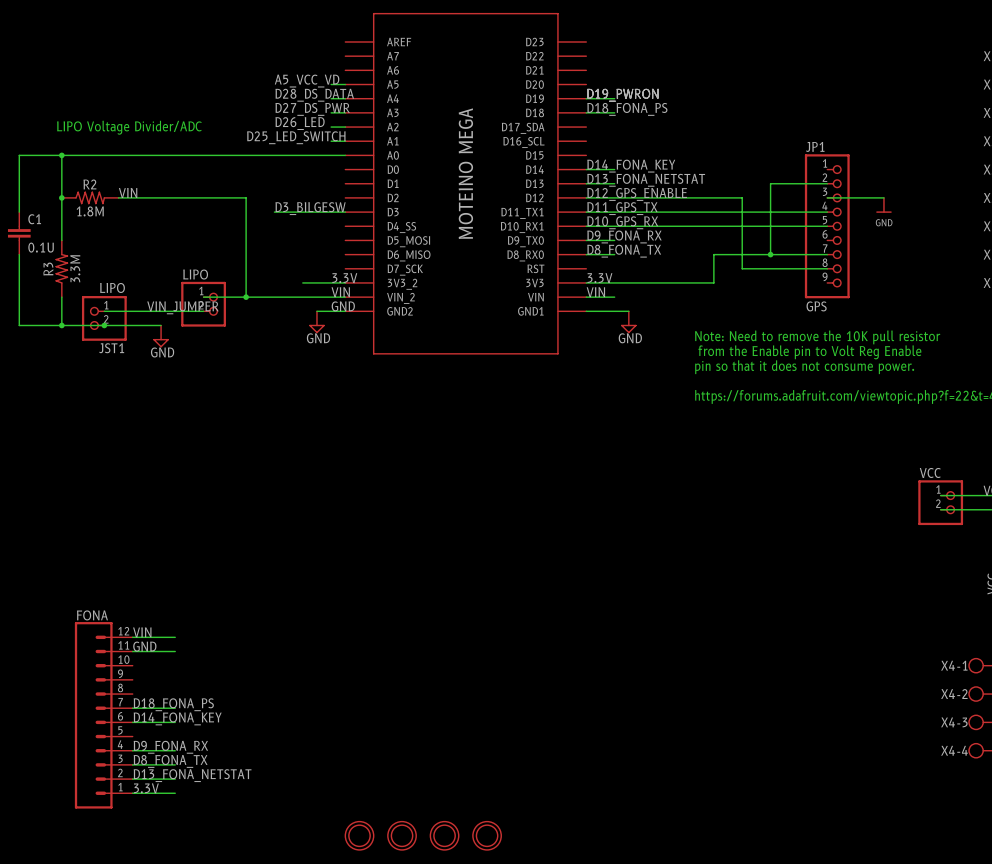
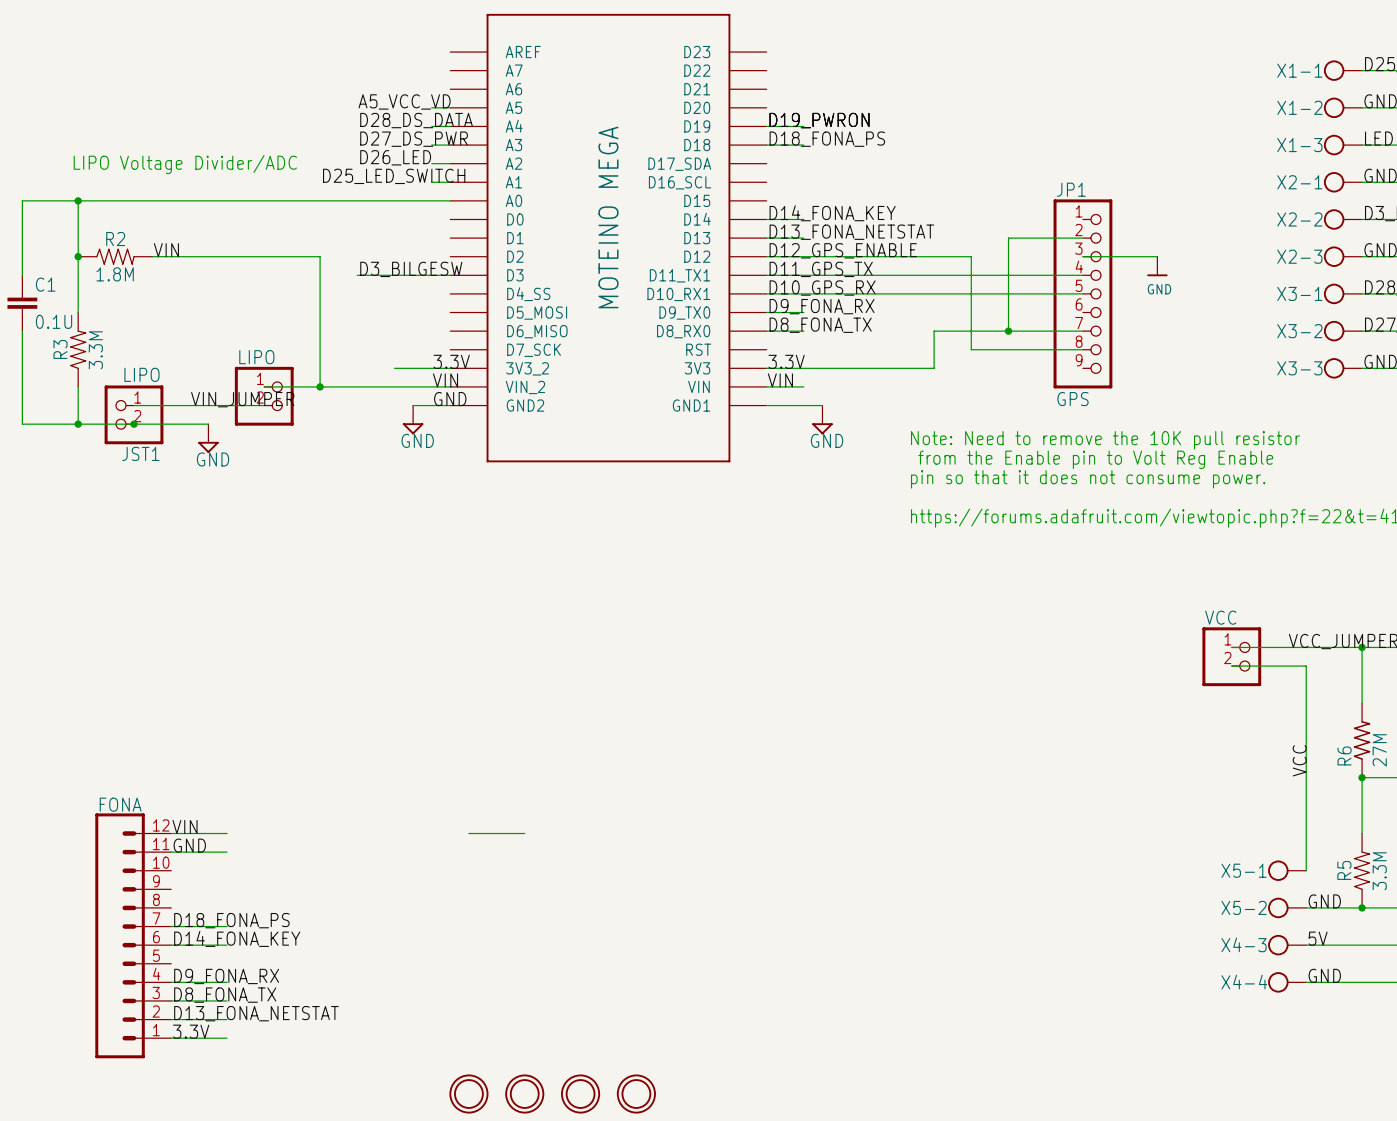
wire: none -> (468, 833) (524, 833)
X4-1 name: X4-1 (954, 665) -> X5-1 (1244, 870)
X4-2 name: X4-2 (954, 694) -> X5-2 (1244, 907)

